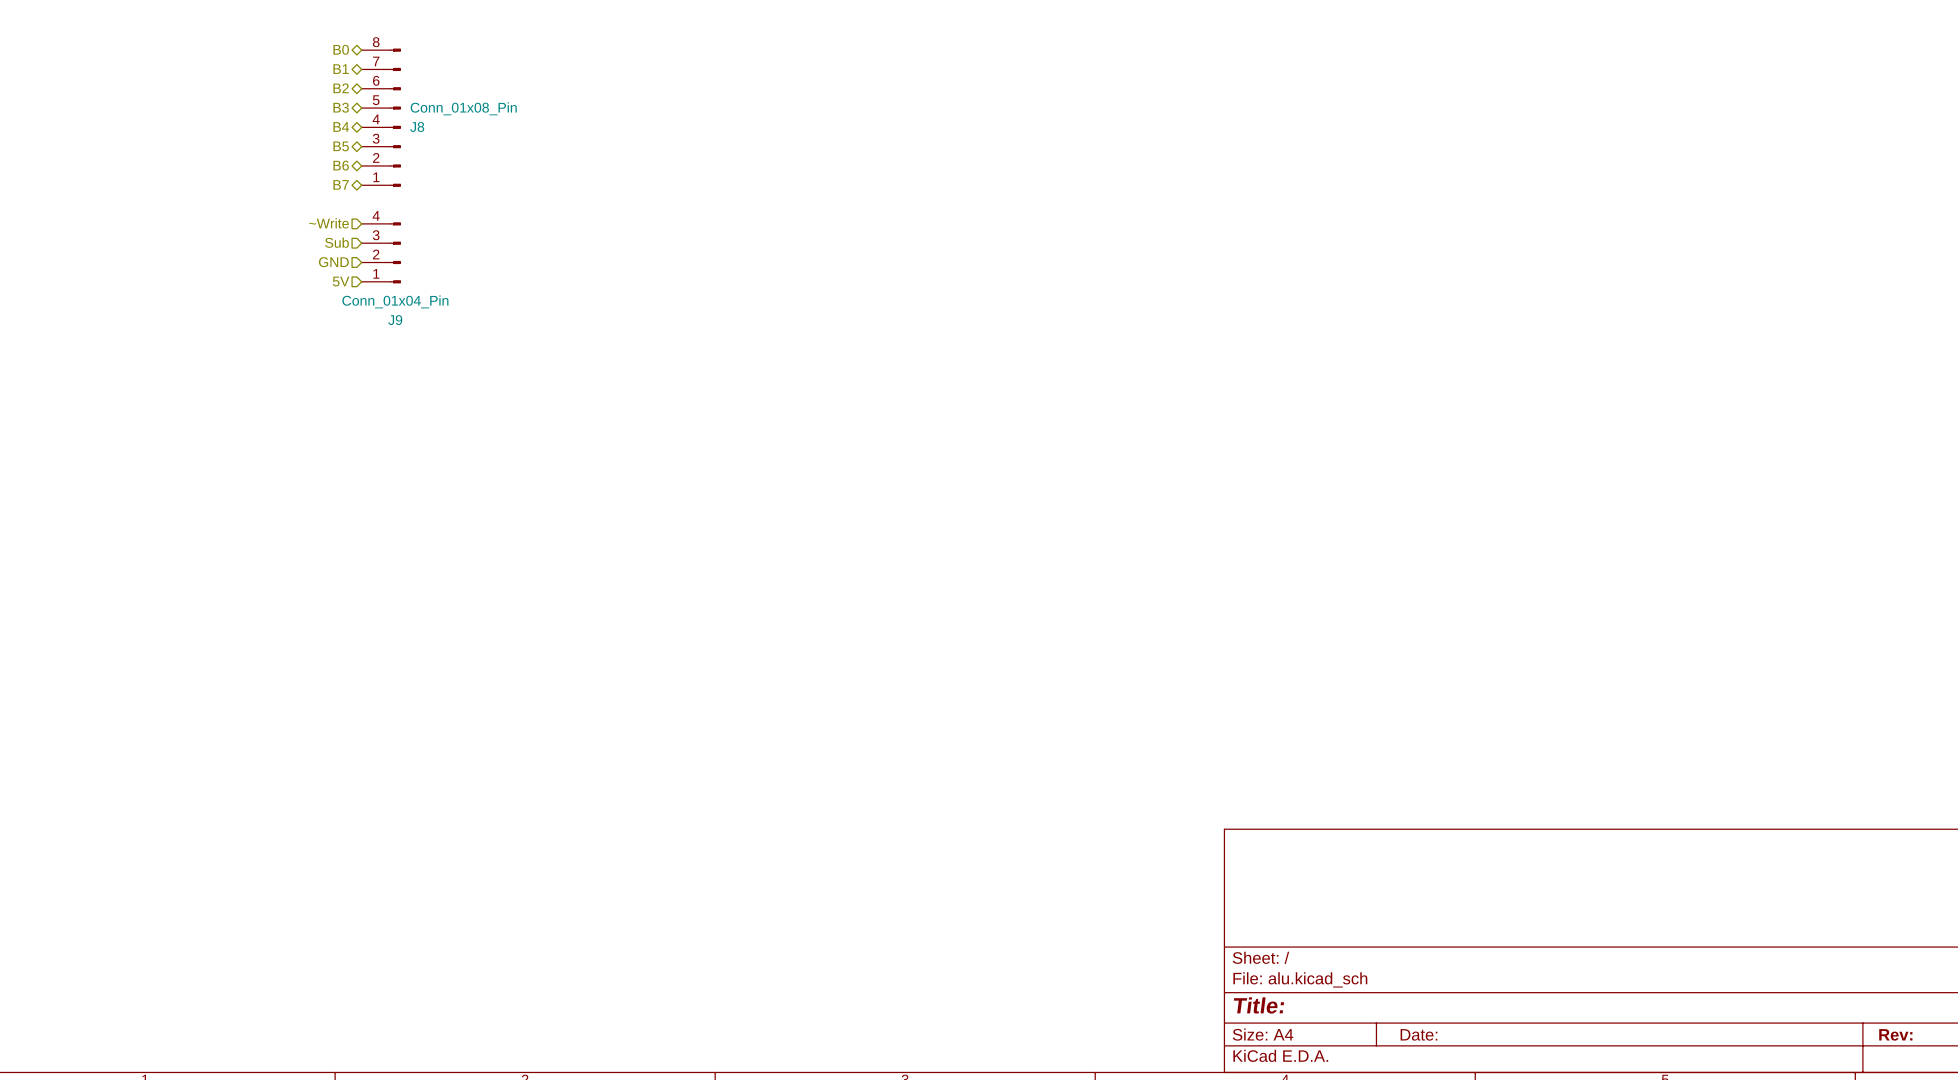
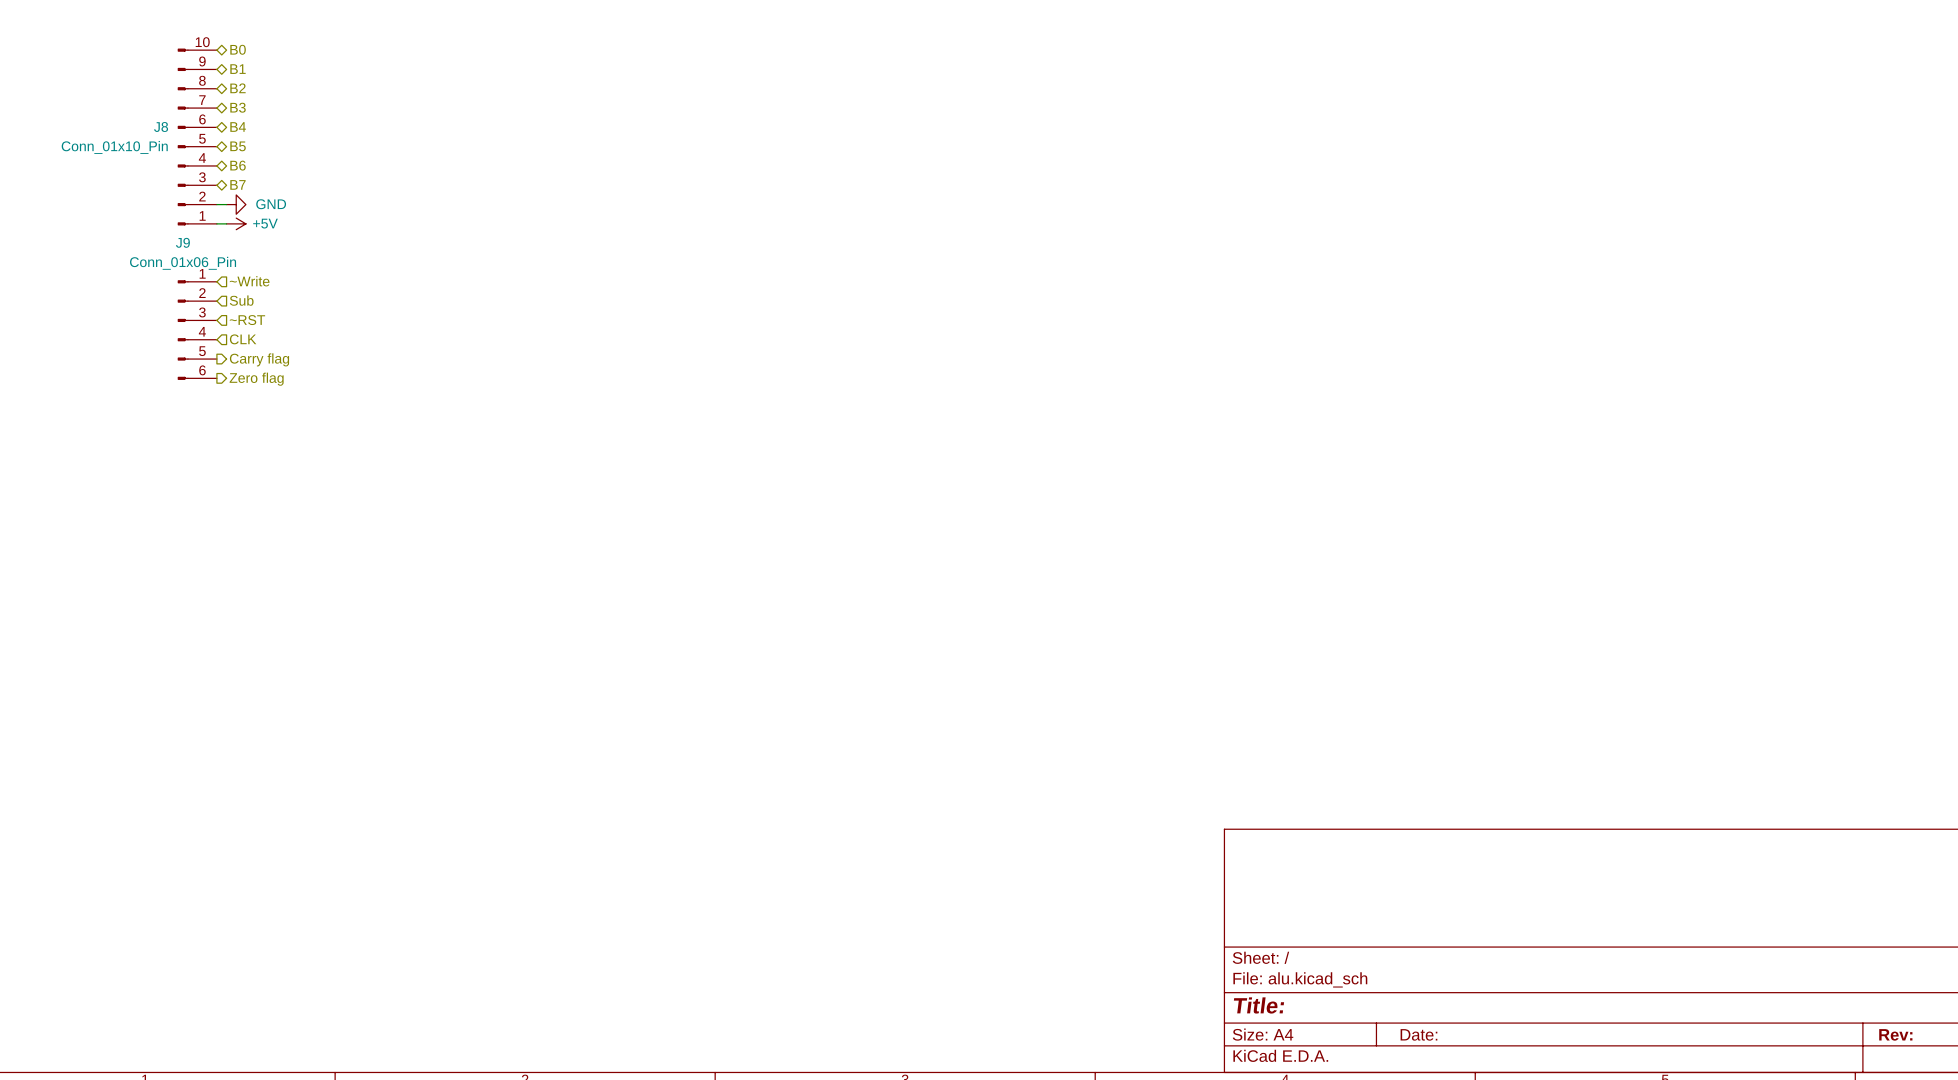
J8 symbol: [361, 48, 401, 187] -> [177, 48, 217, 226]
hierarchical label rotation: 0° (341, 49) -> 180° (238, 49)
hierarchical label position: B0 (341, 49) -> B0 (238, 49)
hierarchical label rotation: 0° (341, 69) -> 180° (238, 69)
hierarchical label position: B1 (341, 69) -> B1 (238, 69)
hierarchical label rotation: 0° (341, 88) -> 180° (237, 88)
hierarchical label position: B2 (341, 88) -> B2 (237, 88)
hierarchical label rotation: 0° (341, 107) -> 180° (238, 107)
hierarchical label position: B3 (341, 107) -> B3 (238, 107)
J8 value: Conn_01x08_Pin (463, 108) -> Conn_01x10_Pin (114, 147)
hierarchical label rotation: 0° (341, 127) -> 180° (238, 127)
hierarchical label position: B4 (341, 127) -> B4 (238, 127)
J8 name position: J8 (417, 127) -> J8 (161, 127)
hierarchical label rotation: 0° (341, 146) -> 180° (238, 146)
hierarchical label position: B5 (341, 146) -> B5 (238, 146)
hierarchical label rotation: 0° (341, 165) -> 180° (238, 165)
hierarchical label position: B6 (341, 165) -> B6 (238, 165)
hierarchical label rotation: 0° (341, 184) -> 180° (237, 184)
hierarchical label position: B7 (341, 184) -> B7 (237, 184)
wire: none -> (216, 204) (226, 204)
power symbol: none -> GND (236, 204)
J9 symbol: [361, 222, 401, 284] -> [177, 280, 217, 380]
wire: none -> (216, 223) (226, 223)
power symbol: none -> +5V (236, 223)
hierarchical label rotation: 0° (329, 223) -> 180° (249, 281)
hierarchical label position: ~Write (329, 223) -> ~Write (249, 281)
hierarchical label rotation: 0° (337, 242) -> 180° (241, 300)
hierarchical label position: Sub (337, 242) -> Sub (241, 300)
hierarchical label: GND (333, 262) -> none
hierarchical label: 5V (341, 281) -> none
J9 value: Conn_01x04_Pin (395, 301) -> Conn_01x06_Pin (183, 263)
hierarchical label: none -> ~RST (247, 320)
J9 name position: J9 (395, 320) -> J9 (182, 242)
hierarchical label: none -> CLK (243, 339)
hierarchical label: none -> Carry flag (259, 359)
hierarchical label: none -> Zero flag (256, 379)

